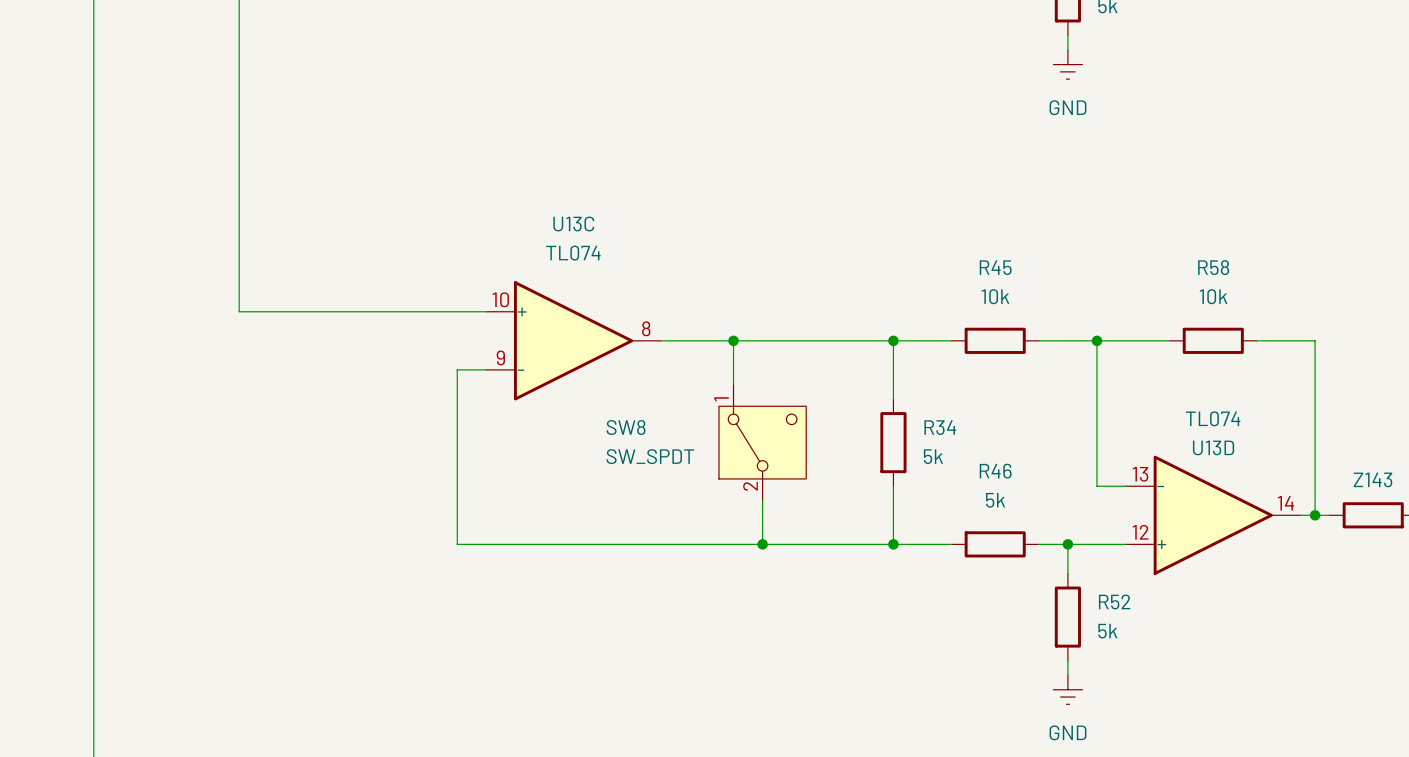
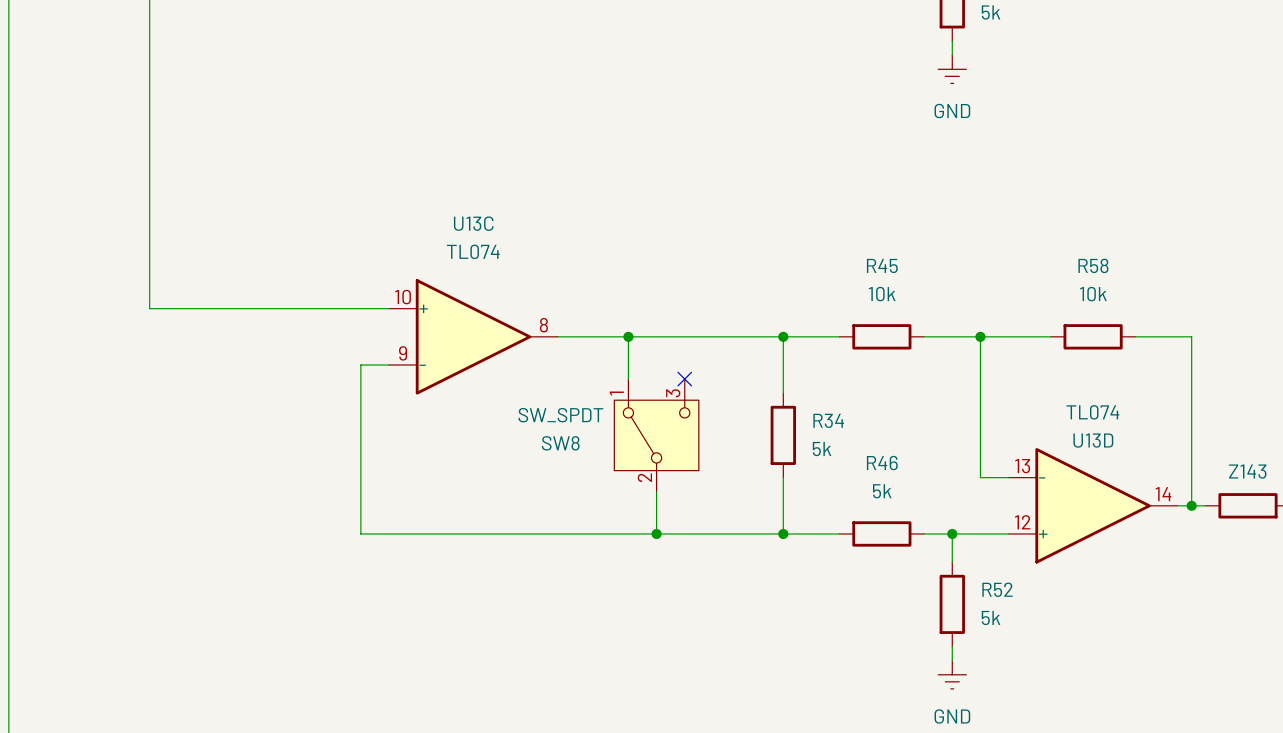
SW8 symbol: [718, 384, 807, 501] -> [614, 379, 699, 492]
no-connect mark: none -> (684, 379)
SW8 name position: SW8 (626, 427) -> SW8 (560, 443)
SW8 value position: SW_SPDT (650, 456) -> SW_SPDT (560, 415)

